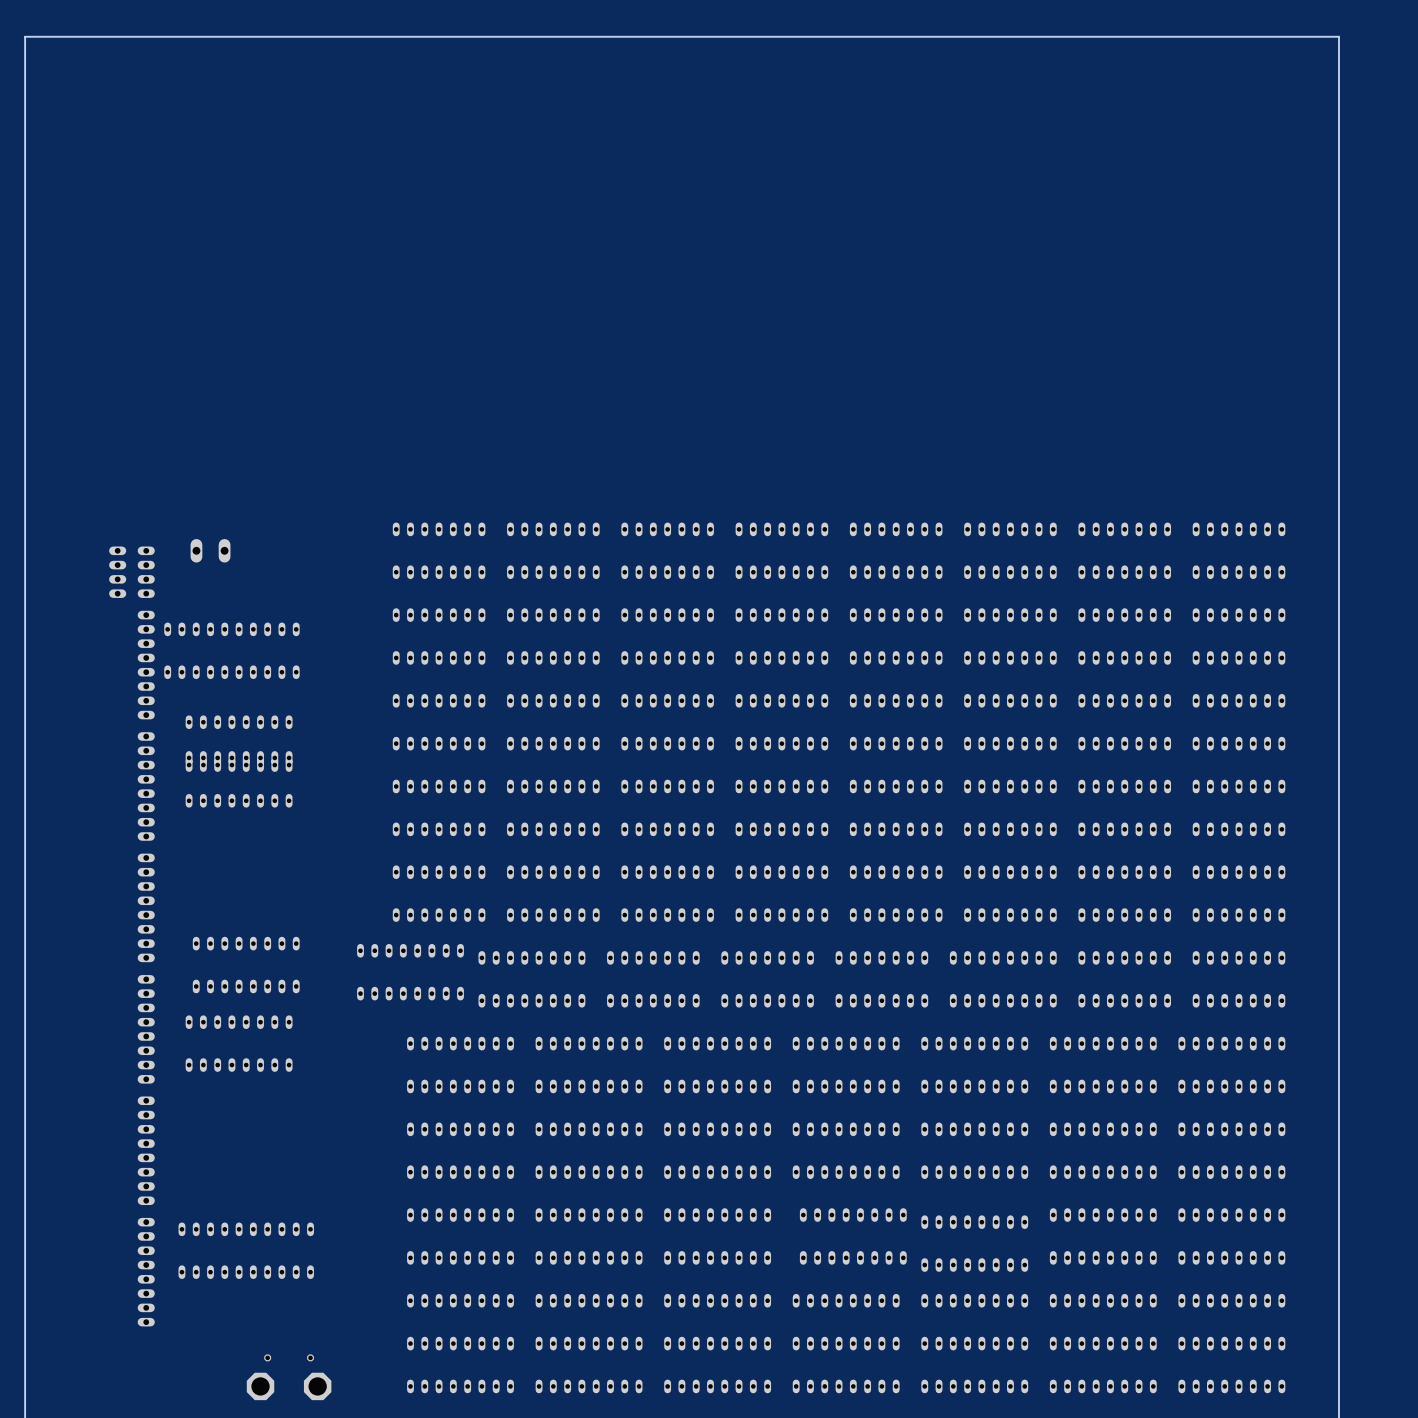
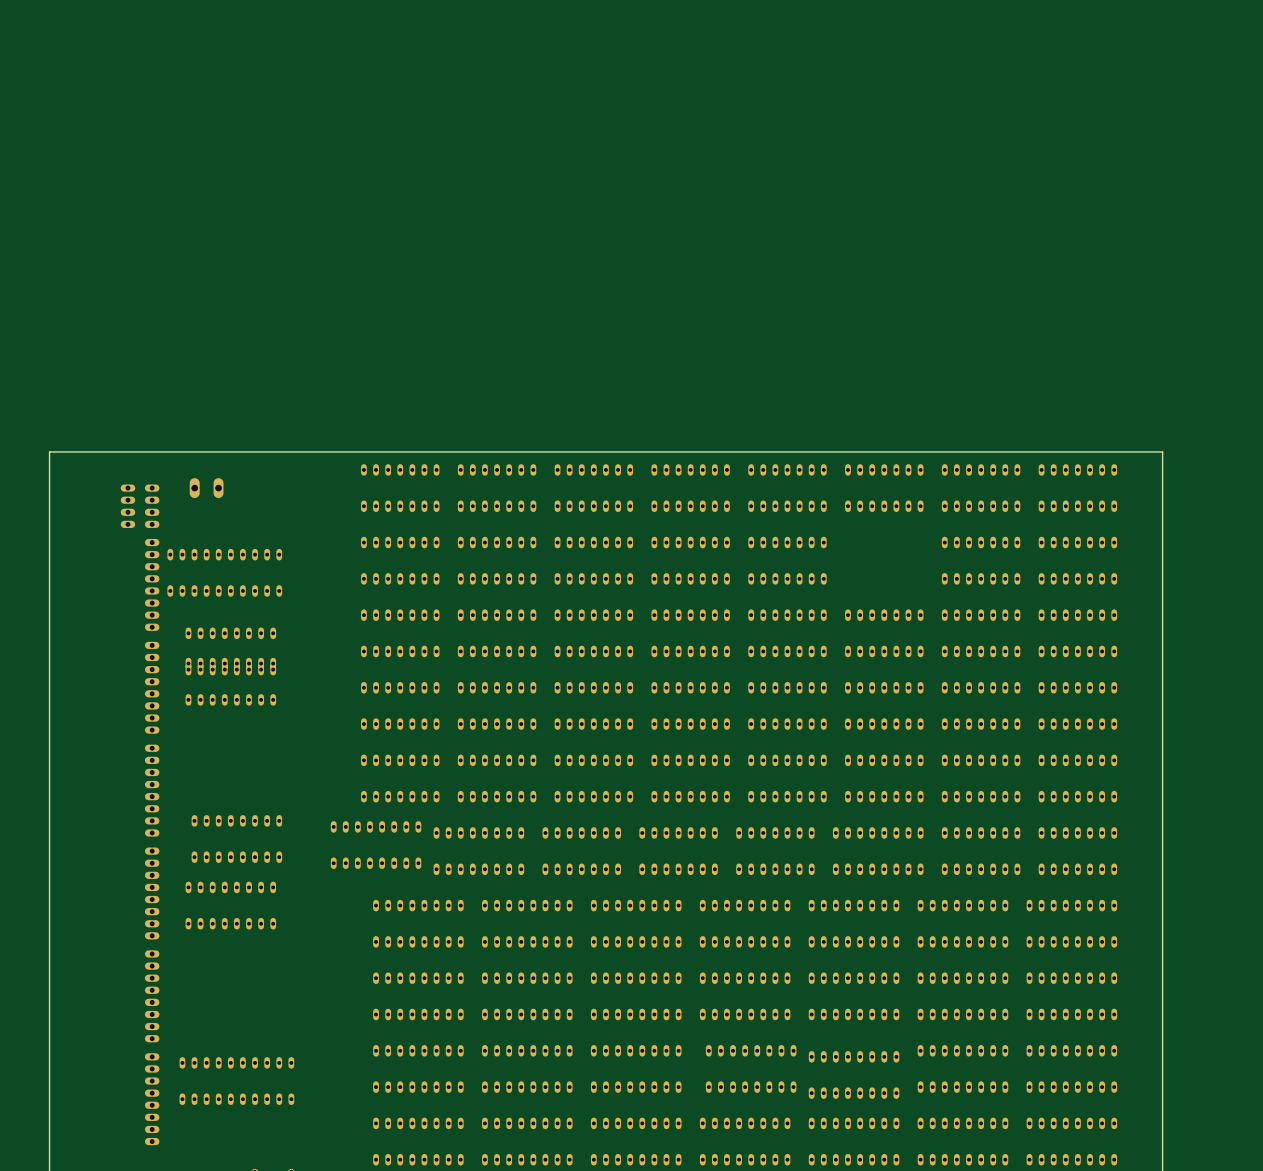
board edge: (1339, 508) (1339, 36) (25, 36) (25, 508) -> (1162, 451) (49, 451)
part: (1010, 636) -> none

